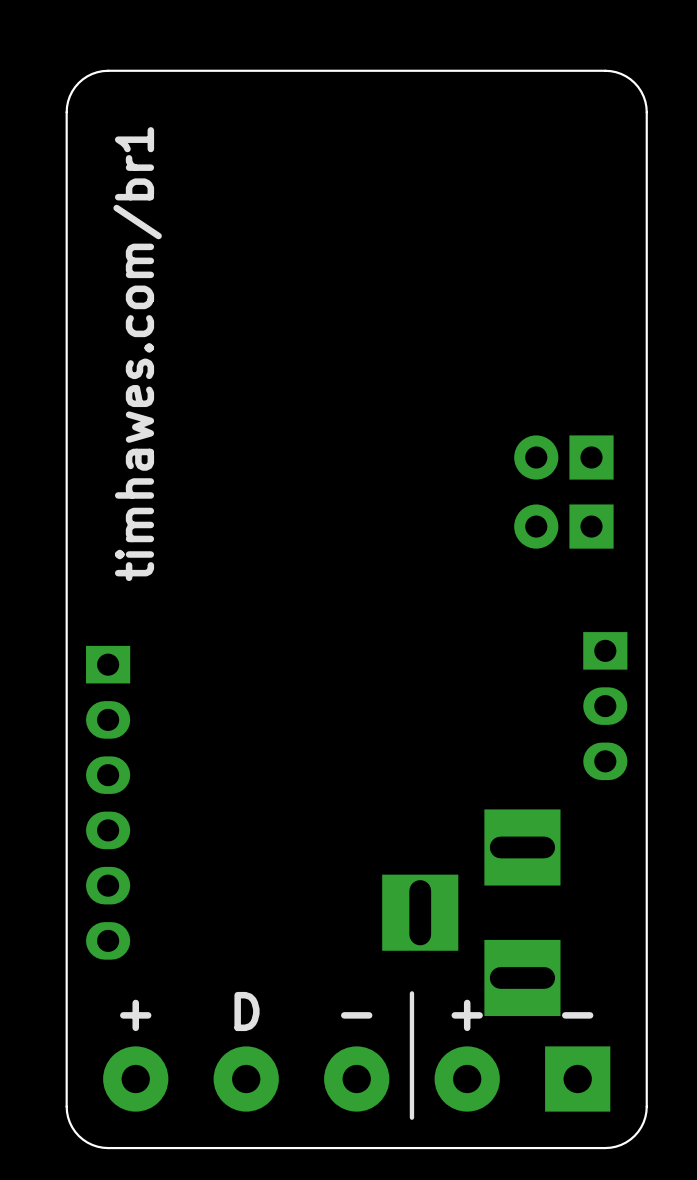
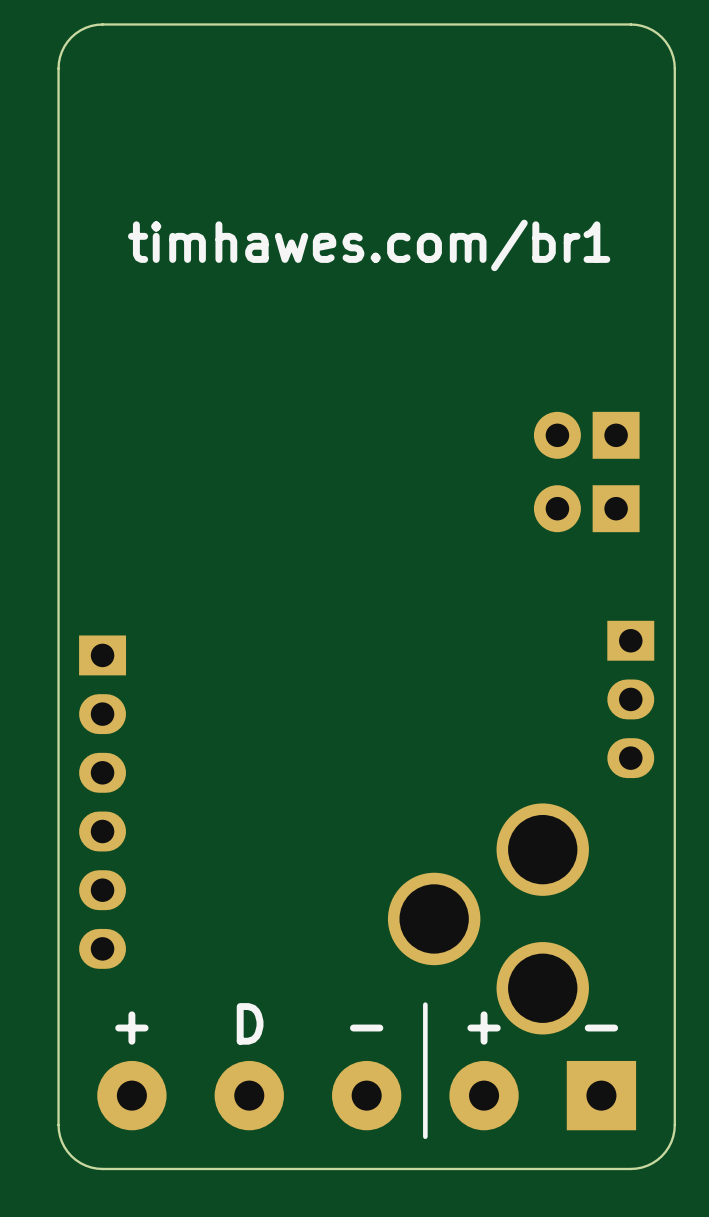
text rotation: 0° (137, 354) -> 90° clockwise (369, 245)
part footprint: [382, 809, 561, 1017] -> [387, 803, 589, 1035]

